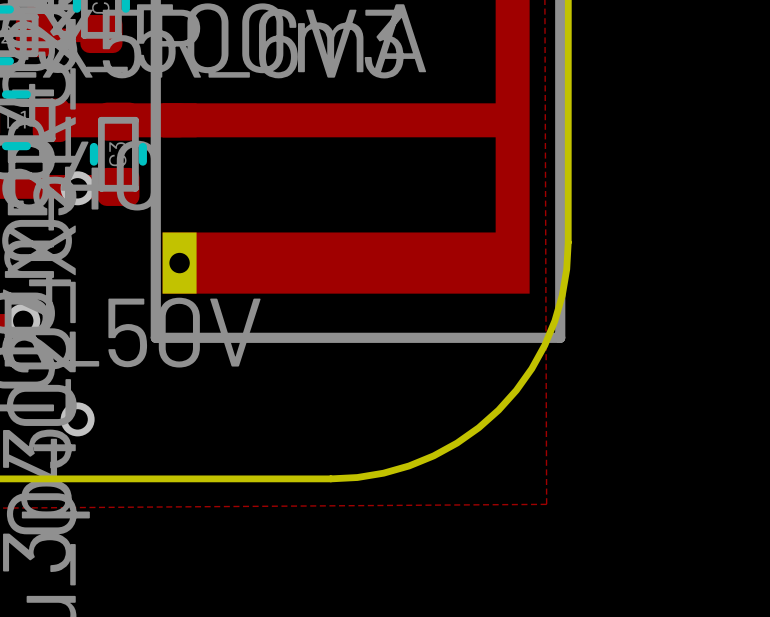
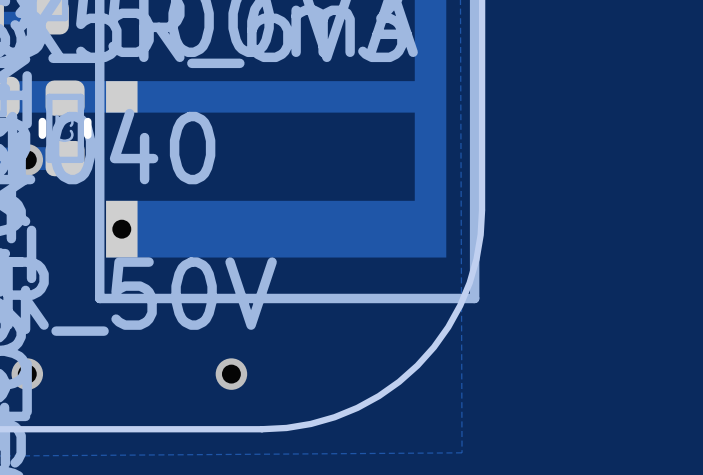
via: none -> (231, 374)

